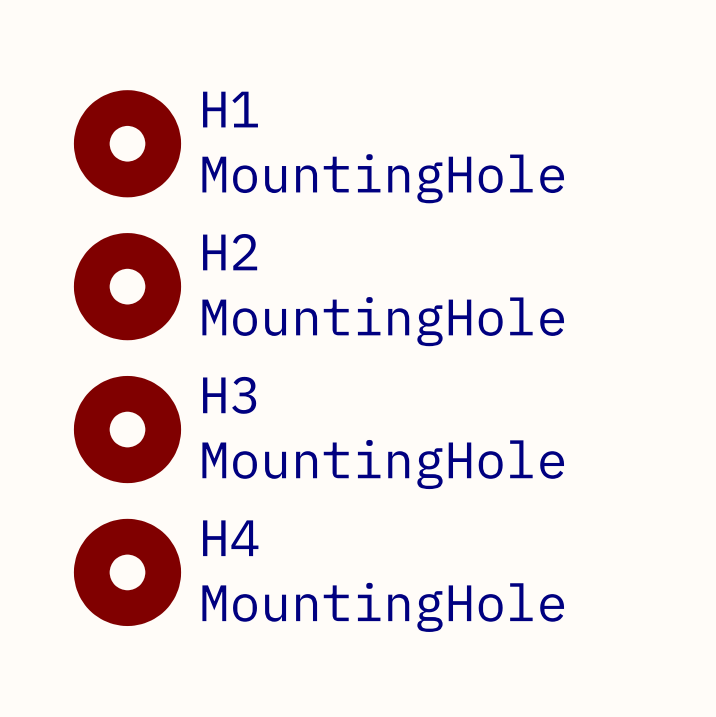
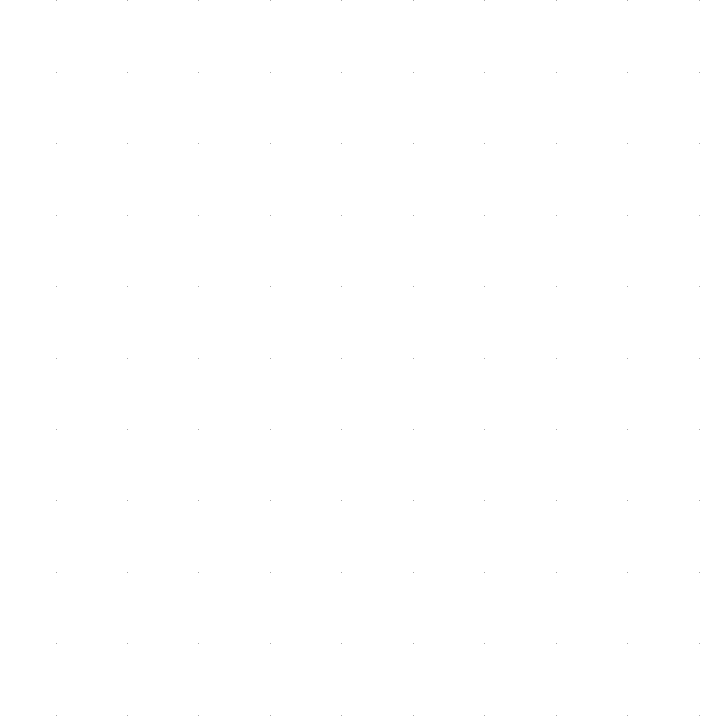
H1: MountingHole (127, 143) -> none
H2: MountingHole (127, 286) -> none
H3: MountingHole (127, 429) -> none
H4: MountingHole (127, 572) -> none

